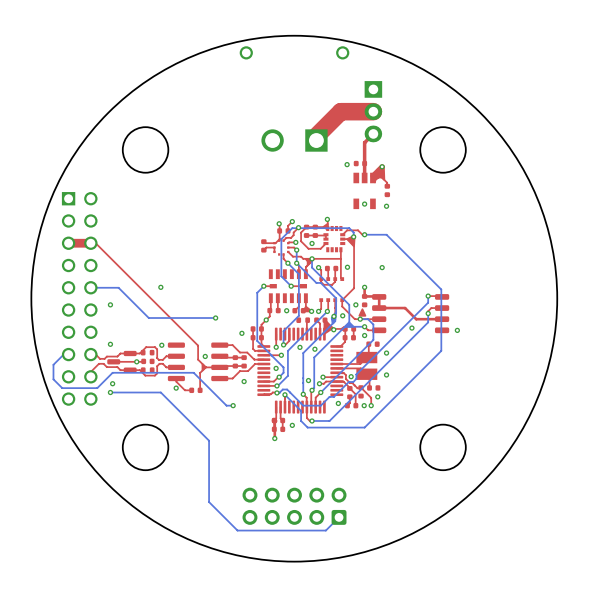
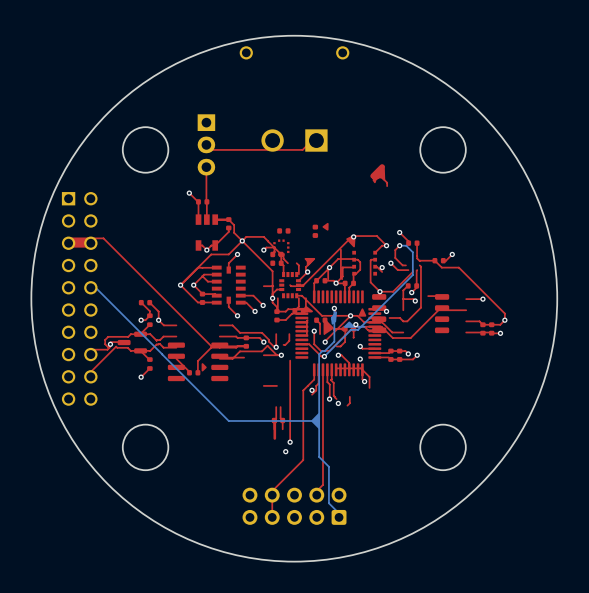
top track: (373, 111) (340, 111) (316, 136) -> (206, 144) (211, 149) (302, 149) (316, 136)
part position: (373, 111) -> (206, 144)
top track: (373, 133) (364, 142) (364, 177) -> none
part: (360, 163) -> none
via: (347, 164) -> none
via: (382, 166) -> none
top track: none -> (206, 167) (206, 219)
part position: (364, 190) -> (206, 232)
part: (387, 190) -> none
top track: none -> (189, 193) (198, 201) (198, 219)
via: none -> (189, 193)
part: none -> (202, 201)
via: (364, 204) -> none
via: (386, 206) -> none
top track: none -> (228, 219) (215, 219)
top track: none -> (228, 219) (234, 225) (234, 232) (272, 271) (272, 302) (276, 307) (276, 311) (301, 309)
top track: (327, 219) (327, 228) (306, 227) (301, 232) (301, 241) (308, 248) (320, 248) (325, 243) -> none
via: (327, 219) -> none
top track: (292, 221) (288, 225) (288, 231) -> none
via: (292, 221) -> none
part: none -> (228, 223)
top track: (279, 223) (279, 240) -> none
via: (279, 223) -> none
top track: none -> (228, 227) (228, 231) (215, 245) (211, 245) (206, 250) (202, 245) (198, 245)
top track: (298, 227) (291, 237) (286, 237) (283, 240) -> none
via: (298, 227) -> none
part: (306, 231) -> none
top track: none -> (399, 232) (408, 243)
via: none -> (399, 232)
top track: (364, 234) (358, 230) (347, 230) (342, 234) -> none
bottom track: (364, 234) (386, 234) (441, 289) (441, 350) (364, 427) (307, 427) (301, 420) (301, 410) (284, 394) -> none
via: (364, 234) -> none
top track: (306, 235) (325, 234) (325, 239) -> none
bottom track: (353, 236) (353, 232) (349, 228) (292, 228) (281, 239) (281, 276) (291, 286) -> none
top track: none -> (68, 238) (103, 238) (211, 346) (246, 346)
top track: (90, 238) (198, 345) (198, 359) (205, 367) -> none
top track: (279, 239) (275, 243) (263, 241) -> none
part: (334, 239) -> none
top track: (342, 239) (347, 239) (354, 245) (354, 288) (342, 300) (342, 306) (354, 319) (379, 319) -> none
via: none -> (242, 240)
top track: none -> (267, 240) (281, 254) (283, 274)
top track: none -> (268, 241) (263, 236) (246, 236) (228, 254) (211, 254) (180, 285) (197, 302) (216, 302)
top track: (295, 242) (288, 243) -> none
via: (295, 242) -> none
via: (312, 243) -> none
part: none -> (412, 243)
top track: none -> (417, 243) (417, 258) (419, 261) (434, 260) (441, 267) (458, 267) (504, 313) (504, 320) (500, 324) (482, 324) (479, 321) (466, 321)
part: (263, 245) -> none
via: none -> (386, 245)
top track: none -> (399, 245) (395, 250) (395, 258) (402, 265) (405, 265)
bottom track: none -> (399, 245) (406, 245) (412, 252) (412, 275) (358, 329) (351, 329) (324, 356)
via: none -> (399, 245)
top track: (288, 247) (294, 247) (296, 250) -> none
via: none -> (206, 250)
via: none -> (263, 250)
bottom track: (296, 250) (296, 263) (316, 282) (320, 282) (336, 298) (336, 313) (332, 316) -> none
via: (296, 250) -> none
top track: (288, 251) (292, 256) (301, 256) (303, 258) (340, 258) -> none
top track: none -> (375, 252) (382, 245) (386, 245) (376, 236) (352, 236) (303, 285) (298, 285)
top track: none -> (237, 254) (228, 263) (228, 270)
via: none -> (237, 254)
part: none -> (276, 254)
top track: none -> (452, 254) (446, 260) (443, 260)
via: none -> (452, 254)
bottom track: (312, 258) (312, 267) (349, 304) (349, 322) (314, 357) (314, 388) (312, 390) -> none
via: (312, 258) -> none
top track: none -> (375, 259) (370, 260) (370, 282) (379, 291) (393, 291) (412, 270)
part: none -> (439, 260)
part: none -> (276, 263)
bottom track: (287, 263) (298, 274) (298, 315) (283, 331) (283, 344) -> none
via: (287, 263) -> none
via: (296, 263) -> none
top track: none -> (390, 263) (397, 270) (408, 270)
via: none -> (390, 263)
top track: none -> (419, 265) (420, 307) (407, 321) (403, 321) (399, 318) (389, 318)
top track: none -> (354, 266) (342, 267) (342, 276) (336, 283)
top track: none -> (376, 266) (382, 271)
top track: none -> (216, 267) (197, 267)
top track: (318, 267) (321, 270) (321, 282) (323, 284) (332, 284) (335, 281) (335, 268) -> none
via: (318, 267) -> none
top track: none -> (329, 267) (338, 259) (353, 259) (360, 262) (360, 269) (353, 274) (353, 283) (349, 287) (349, 296)
top track: none -> (329, 267) (314, 283) (314, 296)
via: none -> (329, 267)
via: (347, 267) -> none
part: (331, 268) -> none
part footprint: [268, 269, 308, 304] -> [279, 272, 302, 299]
top track: none -> (417, 270) (416, 287) (411, 292)
top track: none -> (307, 271) (298, 280)
via: none -> (307, 271)
top track: none -> (216, 274) (202, 276) (207, 281) (216, 281)
top track: none -> (202, 276) (193, 285) (202, 293)
part: none -> (320, 280)
top track: none -> (325, 280) (345, 283) (344, 296)
bottom track: none -> (90, 282) (162, 354)
via: none -> (336, 283)
part: none -> (349, 283)
via: none -> (180, 285)
via: none -> (193, 285)
part: none -> (228, 285)
top track: none -> (408, 285) (403, 290) (403, 310)
part: none -> (412, 285)
bottom track: (263, 286) (257, 292) (257, 341) (271, 355) -> none
via: (263, 286) -> none
via: (291, 286) -> none
bottom track: (90, 287) (118, 287) (148, 318) (215, 318) -> none
via: (160, 287) -> none
top track: (364, 287) (364, 296) (379, 296) (379, 308) (405, 308) (416, 319) (442, 319) -> none
via: (364, 287) -> none
top track: none -> (281, 289) (276, 289) (272, 293)
part rotation: 0° (331, 289) -> 90° clockwise (364, 263)
part position: (331, 289) -> (364, 263)
via: none -> (379, 291)
via: none -> (411, 292)
top track: none -> (202, 294) (216, 295)
top track: none -> (240, 295) (253, 295) (263, 305)
top track: none -> (296, 295) (301, 295) (322, 315) (357, 315) (364, 322) (382, 322) (392, 332) (403, 332)
bottom track: (428, 296) (428, 302) (356, 374) -> none
via: (428, 296) -> none
part: none -> (202, 298)
top track: (270, 298) (269, 316) (261, 324) (261, 344) (263, 346) -> none
via: none -> (272, 298)
top track: none -> (403, 299) (413, 299) (415, 300)
top track: none -> (482, 299) (466, 299)
via: none -> (482, 299)
top track: none -> (228, 300) (228, 307) (237, 315)
top track: (321, 300) (321, 308) (318, 311) -> none
top track: (328, 300) (327, 311) -> none
top track: (335, 300) (335, 307) -> none
part: (364, 300) -> none
via: none -> (415, 300)
top track: none -> (141, 302) (149, 311) (149, 315) (145, 320) (141, 320)
part: none -> (145, 302)
top track: none -> (149, 302) (158, 311) (158, 320) (163, 325) (176, 325)
top track: none -> (240, 302) (246, 302) (255, 311)
via: (110, 304) -> none
via: (355, 304) -> none
via: none -> (263, 305)
bottom track: none -> (334, 308) (334, 341) (319, 354) (319, 456) (328, 466) (328, 503) (339, 513)
via: none -> (334, 308)
top track: (442, 308) (431, 308) (428, 313) -> none
part rotation: 0° (274, 310) -> 90° clockwise (276, 315)
via: (286, 310) -> none
top track: none -> (466, 310) (438, 310) (410, 337) (392, 337) (381, 326) (358, 326) (355, 324) (329, 350) (320, 350) (314, 344) (314, 331)
via: none -> (255, 311)
via: (311, 311) -> none
via: (318, 311) -> none
bottom track: (327, 311) (287, 350) (287, 375) (277, 385) -> none
via: (327, 311) -> none
via: none -> (386, 311)
top track: none -> (301, 313) (292, 313) (285, 320) (276, 320)
bottom track: (428, 313) (428, 322) (329, 420) (319, 420) -> none
via: (428, 313) -> none
via: none -> (237, 315)
via: (342, 315) -> none
top track: none -> (350, 315) (325, 342)
via: none -> (350, 315)
via: (333, 316) -> none
via: (215, 318) -> none
bottom track: (360, 318) (368, 319) (373, 324) (373, 339) (320, 392) -> none
via: (266, 319) -> none
via: (360, 319) -> none
via: none -> (141, 320)
part: none -> (149, 320)
via: none -> (158, 320)
part: (303, 320) -> none
via: none -> (504, 320)
bottom track: (333, 321) (303, 353) (303, 394) -> none
top track: none -> (149, 324) (140, 334)
via: none -> (355, 324)
top track: none -> (219, 325) (232, 325) (240, 332) (261, 332) (273, 346) (277, 346)
via: (364, 326) -> none
top track: (253, 328) (253, 348) (255, 350) (263, 350) -> none
part: (257, 328) -> none
via: (411, 328) -> none
part: none -> (482, 328)
part: none -> (491, 328)
via: (333, 329) -> none
via: (457, 330) -> none
via: none -> (314, 331)
top track: none -> (466, 332) (500, 333)
via: (241, 333) -> none
via: none -> (500, 333)
via: (364, 335) -> none
top track: none -> (176, 336) (163, 336) (156, 340)
top track: none -> (219, 336) (259, 337) (263, 342)
part: (257, 337) -> none
part: (349, 337) -> none
top track: none -> (110, 342) (124, 342)
part: none -> (246, 342)
via: none -> (263, 342)
via: none -> (325, 342)
via: (283, 344) -> none
top track: none -> (301, 344) (309, 344) (321, 356) (324, 356)
top track: (368, 344) (368, 355) (360, 364) (336, 364) -> none
part: (372, 344) -> none
via: (161, 345) -> none
top track: (219, 345) (232, 345) (240, 352) (247, 352) (254, 359) (263, 359) -> none
top track: none -> (237, 346) (211, 347) (197, 360) (197, 372)
top track: none -> (360, 346) (362, 348) (374, 348)
via: none -> (360, 346)
via: (299, 347) -> none
bottom track: (68, 349) (53, 364) (53, 379) (62, 388) (97, 388) (112, 372) (193, 372) (226, 405) (233, 405) -> none
top track: (90, 349) (100, 358) (117, 356) (120, 353) (139, 353) (146, 347) (154, 347) (158, 359) (162, 359) (166, 356) (176, 356) -> (90, 349) (107, 349) (109, 347) (105, 344) (105, 339) (108, 336) (150, 334) (156, 340)
via: (314, 349) -> none
top track: none -> (140, 350) (149, 359)
part: (147, 352) -> none
top track: none -> (374, 353) (405, 351) (408, 353)
via: (386, 353) -> none
via: none -> (408, 353)
bottom track: none -> (162, 354) (228, 420) (312, 420)
bottom track: (271, 355) (283, 367) (283, 372) (279, 377) -> none
top track: none -> (276, 355) (267, 345) (261, 351) (240, 351) (232, 358) (219, 358)
top track: none -> (338, 355) (341, 355) (349, 363) (349, 369)
via: none -> (338, 355)
part: none -> (390, 355)
part: none -> (399, 355)
top track: none -> (417, 355) (413, 359) (390, 359)
via: none -> (417, 355)
via: (205, 356) -> none
via: none -> (324, 356)
top track: none -> (388, 357) (374, 357)
top track: none -> (176, 358) (189, 372)
via: none -> (360, 359)
top track: none -> (290, 360) (290, 442)
part position: (121, 361) -> (132, 342)
via: (136, 361) -> none
top track: (143, 361) (113, 361) -> none
part: (147, 361) -> none
part: (235, 361) -> none
part: (244, 361) -> none
top track: (98, 363) (103, 363) (106, 367) (117, 367) (120, 370) (139, 370) (145, 375) (154, 375) (159, 363) (162, 363) (166, 367) (176, 367) -> (98, 363) (116, 346) (127, 347) (130, 350) (150, 350) (158, 344) (163, 347) (176, 347)
part: none -> (149, 364)
top track: (263, 364) (255, 364) (247, 371) (240, 371) (232, 378) (219, 378) -> none
part: (366, 365) -> none
top track: (244, 366) (205, 367) (200, 372) (200, 390) -> none
top track: none -> (149, 368) (141, 377)
via: (276, 368) -> none
top track: none -> (314, 369) (314, 379) (303, 390) (303, 460) (272, 491) (272, 513)
top track: none -> (318, 369) (318, 383) (312, 394)
top track: none -> (322, 369) (322, 484) (316, 491)
top track: none -> (327, 369) (329, 399)
top track: none -> (331, 369) (330, 380) (333, 382) (333, 395) (336, 399)
top track: none -> (362, 369) (362, 379) (364, 381)
part: (147, 370) -> none
part position: (300, 370) -> (338, 333)
top track: (336, 372) (343, 373) (345, 378) (354, 385) -> none
bottom track: (356, 374) (356, 378) (353, 381) (348, 381) -> none
via: (386, 374) -> none
via: (351, 376) -> none
via: none -> (141, 377)
top track: (279, 377) (273, 381) (263, 381) -> none
via: (279, 377) -> none
via: (322, 377) -> none
top track: (336, 377) (322, 377) -> none
top track: (176, 378) (176, 381) (184, 390) (191, 390) -> none
via: (308, 380) -> none
via: (244, 381) -> none
bottom track: (348, 381) (333, 396) (329, 396) (320, 405) (303, 405) (287, 389) (276, 392) -> none
via: none -> (364, 381)
via: (112, 383) -> none
top track: (319, 383) (326, 381) (343, 381) (349, 388) -> none
via: (319, 383) -> none
via: (276, 385) -> none
top track: (354, 385) (358, 388) -> none
top track: (361, 387) (371, 397) (371, 405) -> none
part: (373, 387) -> none
via: (176, 388) -> none
top track: (349, 388) (355, 394) (355, 405) -> none
part position: (195, 390) -> (193, 372)
top track: (312, 390) (311, 407) -> none
part: (361, 391) -> none
bottom track: (110, 392) (160, 392) (209, 440) (209, 502) (237, 530) (325, 530) (339, 517) -> none
via: (110, 392) -> none
top track: (276, 392) (263, 394) -> none
via: (276, 392) -> none
top track: (320, 392) (315, 397) (315, 407) -> none
via: (320, 392) -> none
part: (349, 392) -> none
via: (284, 394) -> none
top track: (303, 394) (306, 397) (306, 418) (312, 420) -> none
via: (303, 394) -> none
via: (377, 396) -> none
via: none -> (329, 399)
via: (233, 405) -> none
part: (351, 405) -> none
via: (364, 405) -> none
via: (371, 405) -> none
drawing: none -> [311, 412, 321, 429]
via: (312, 420) -> none
via: (292, 425) -> none
part: (278, 429) -> none
via: (274, 438) -> none
via: none -> (290, 442)
via: none -> (285, 451)

